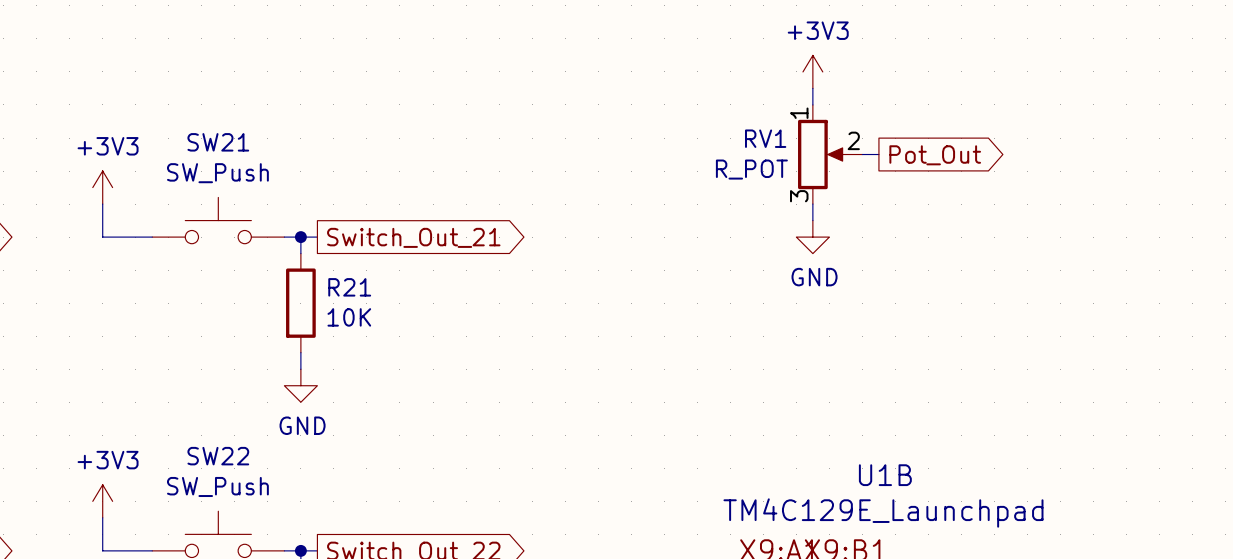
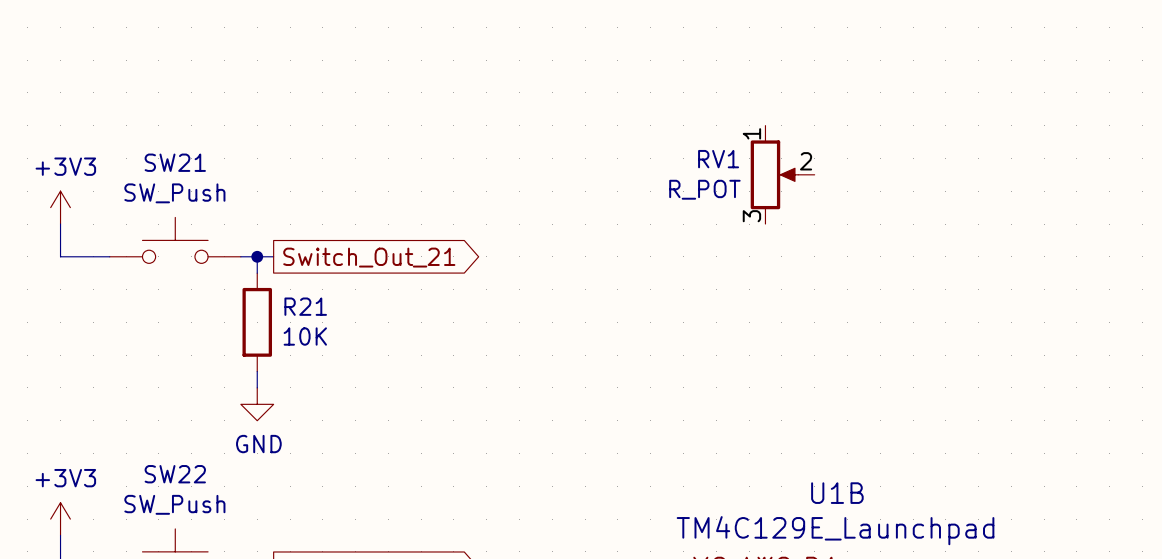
power symbol: +3V3 (812, 71) -> none
wire: (812, 88) (812, 104) -> none
wire: (862, 154) (878, 154) -> none
global label: Pot_Out (935, 155) -> none
wire: (812, 204) (812, 220) -> none
power symbol: GND (812, 237) -> none

